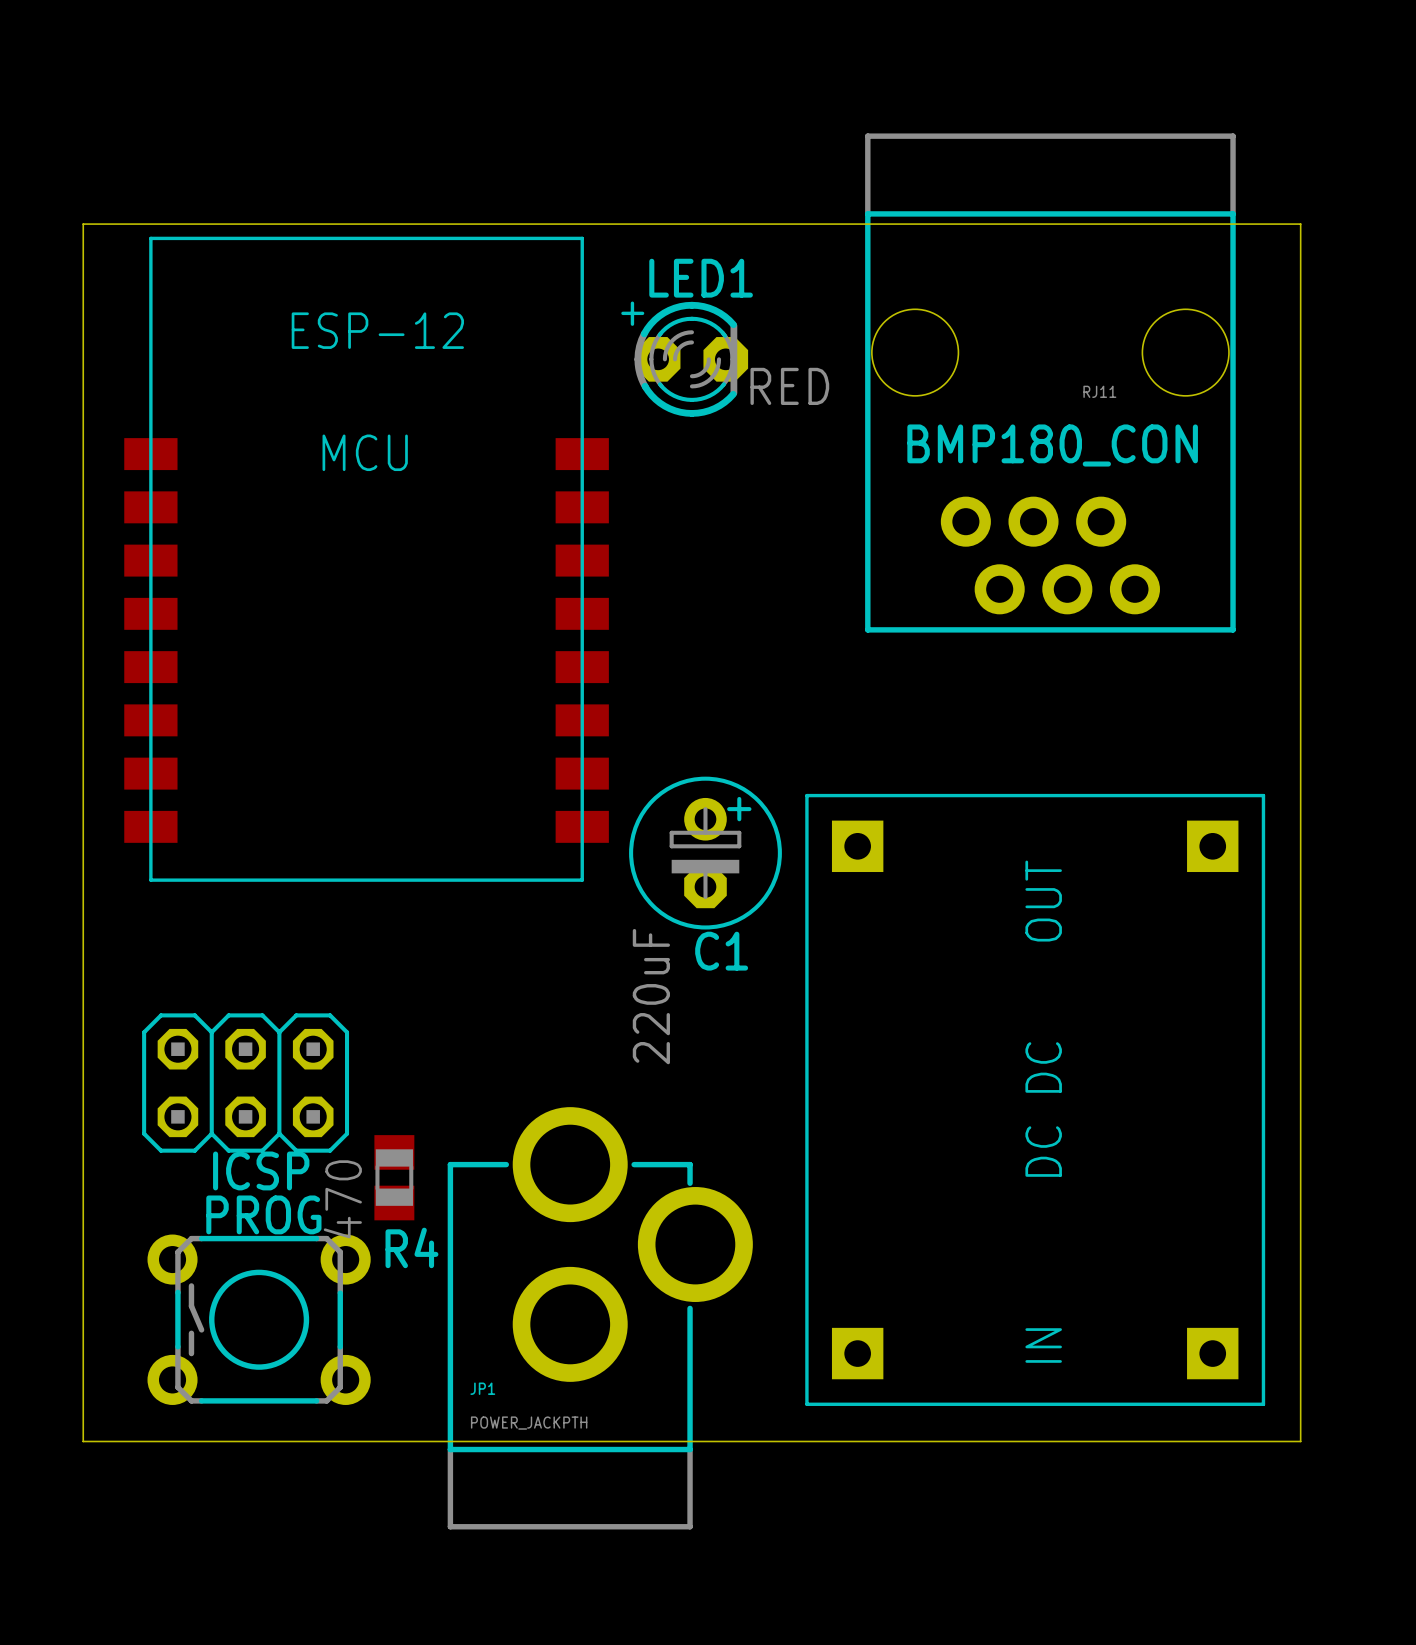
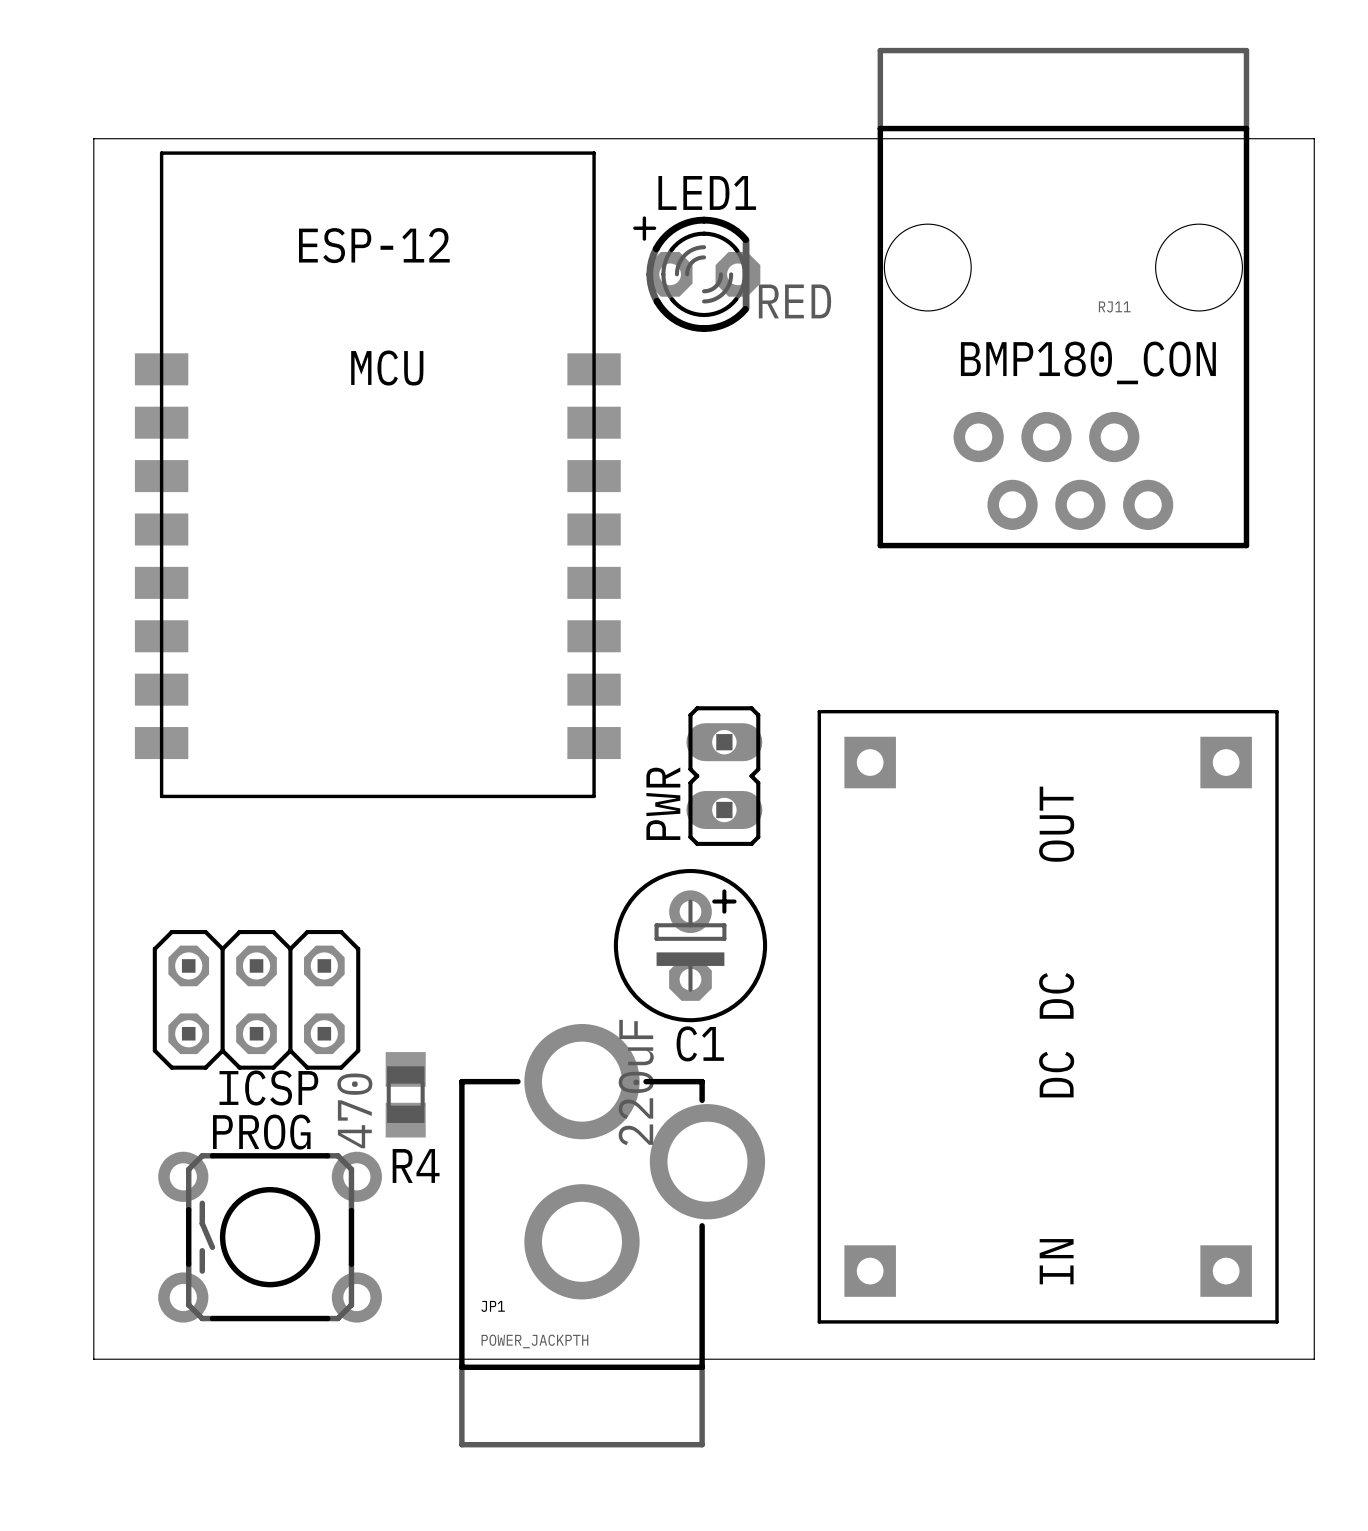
C1 position: (705, 853) -> (690, 945)
PWR: none -> (724, 776)

